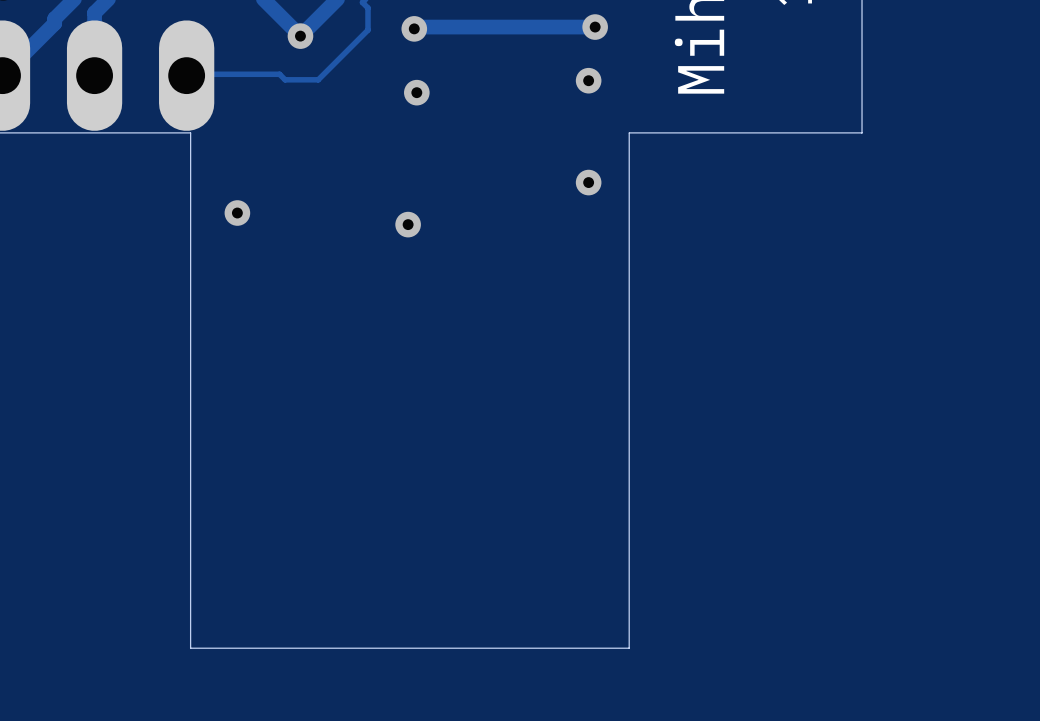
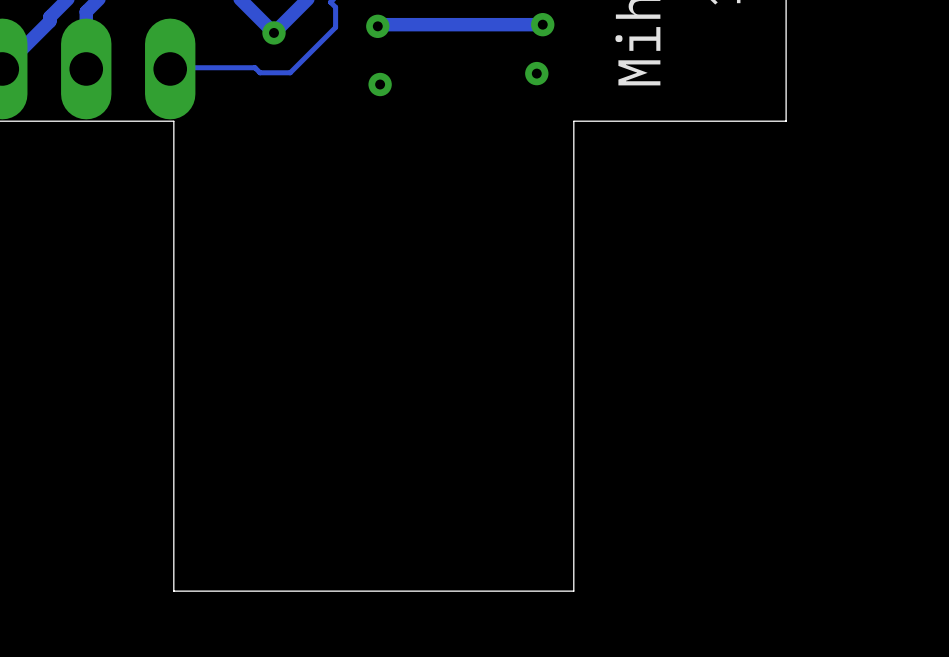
via: (588, 182) -> none
via: (237, 213) -> none
via: (408, 224) -> none

